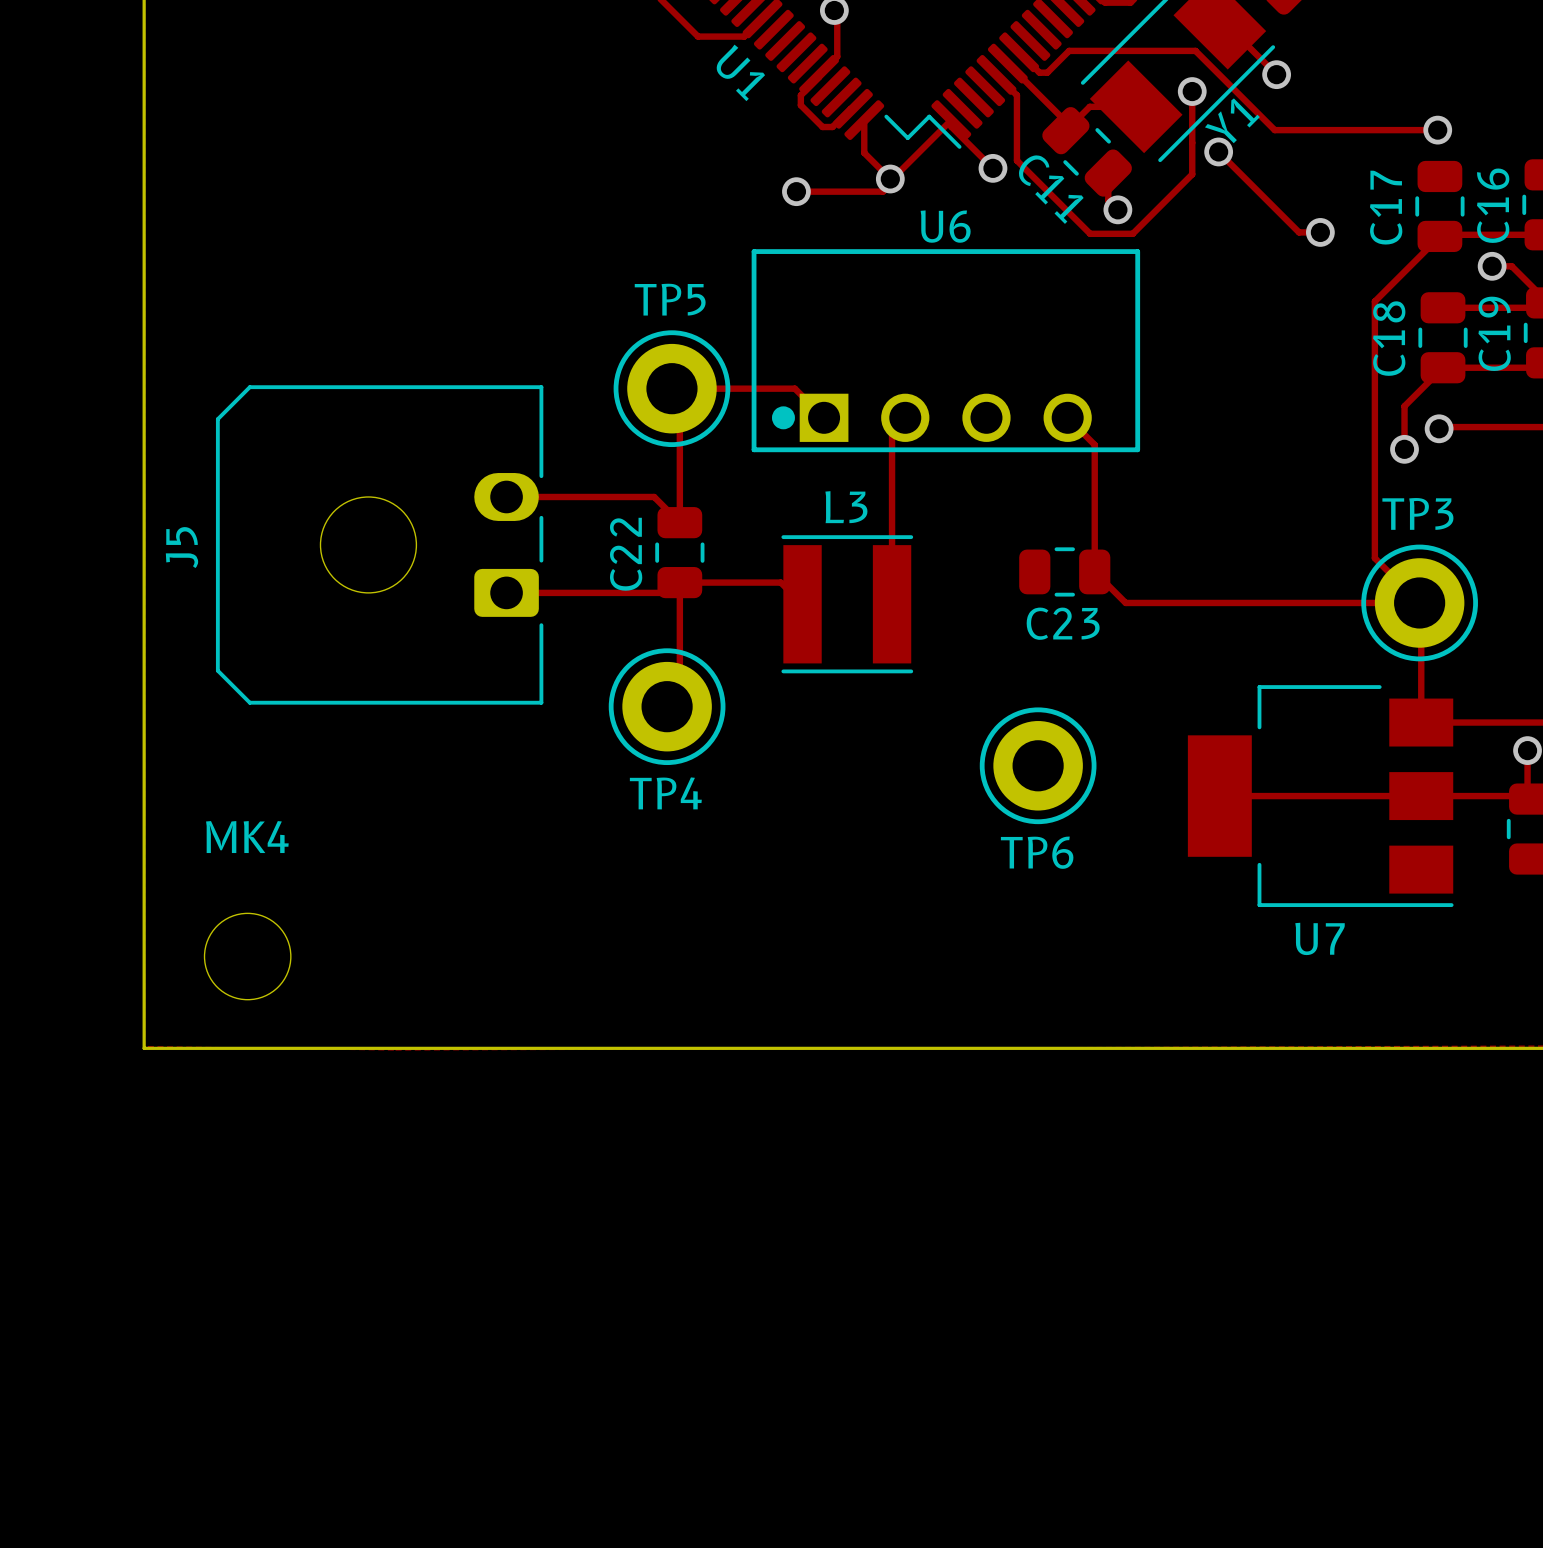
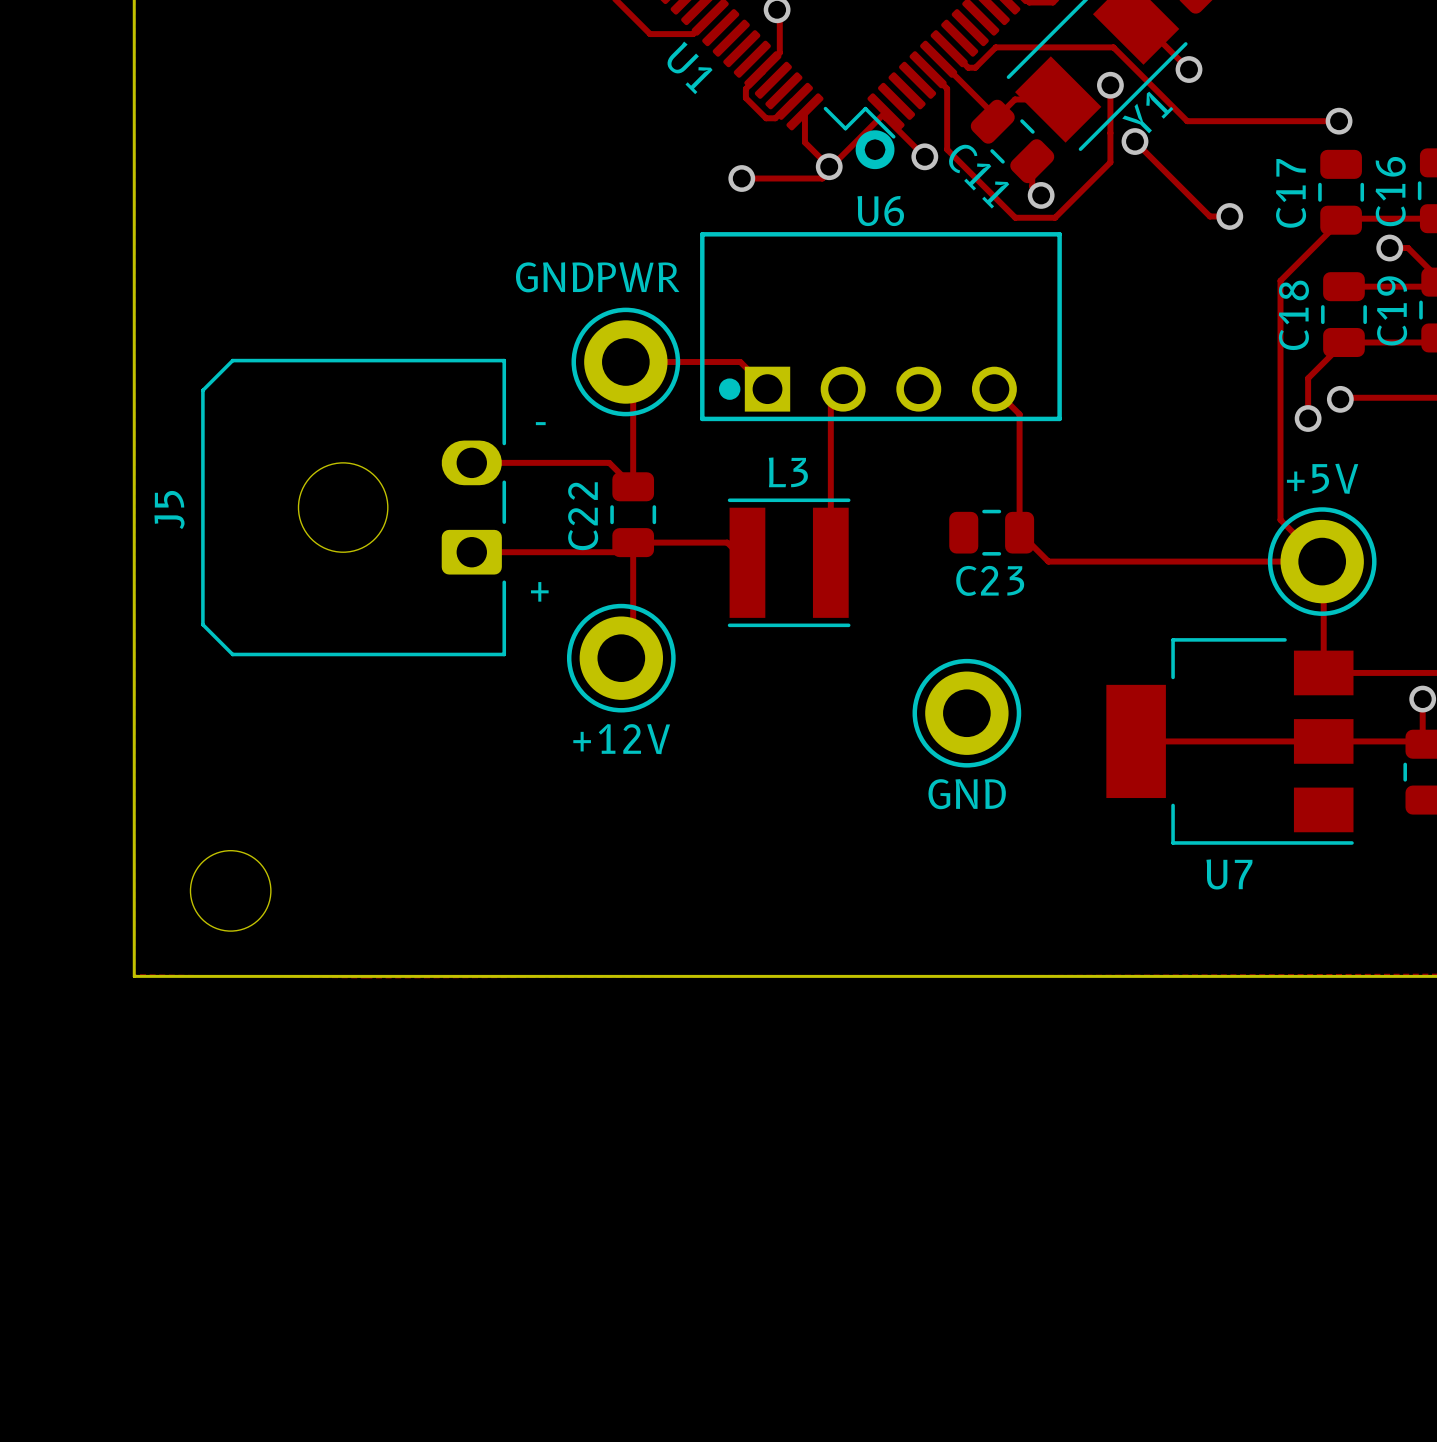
drawing: none -> [855, 130, 895, 170]
TP5 name: TP5 (670, 299) -> GNDPWR (597, 277)
text: none -> - (540, 423)
TP3 name: TP3 (1417, 513) -> +5V (1322, 478)
text: none -> + (539, 591)
TP4 name: TP4 (665, 793) -> +12V (621, 739)
MK4 name: MK4 (247, 837) -> none
TP6 name: TP6 (1037, 852) -> GND (967, 794)

